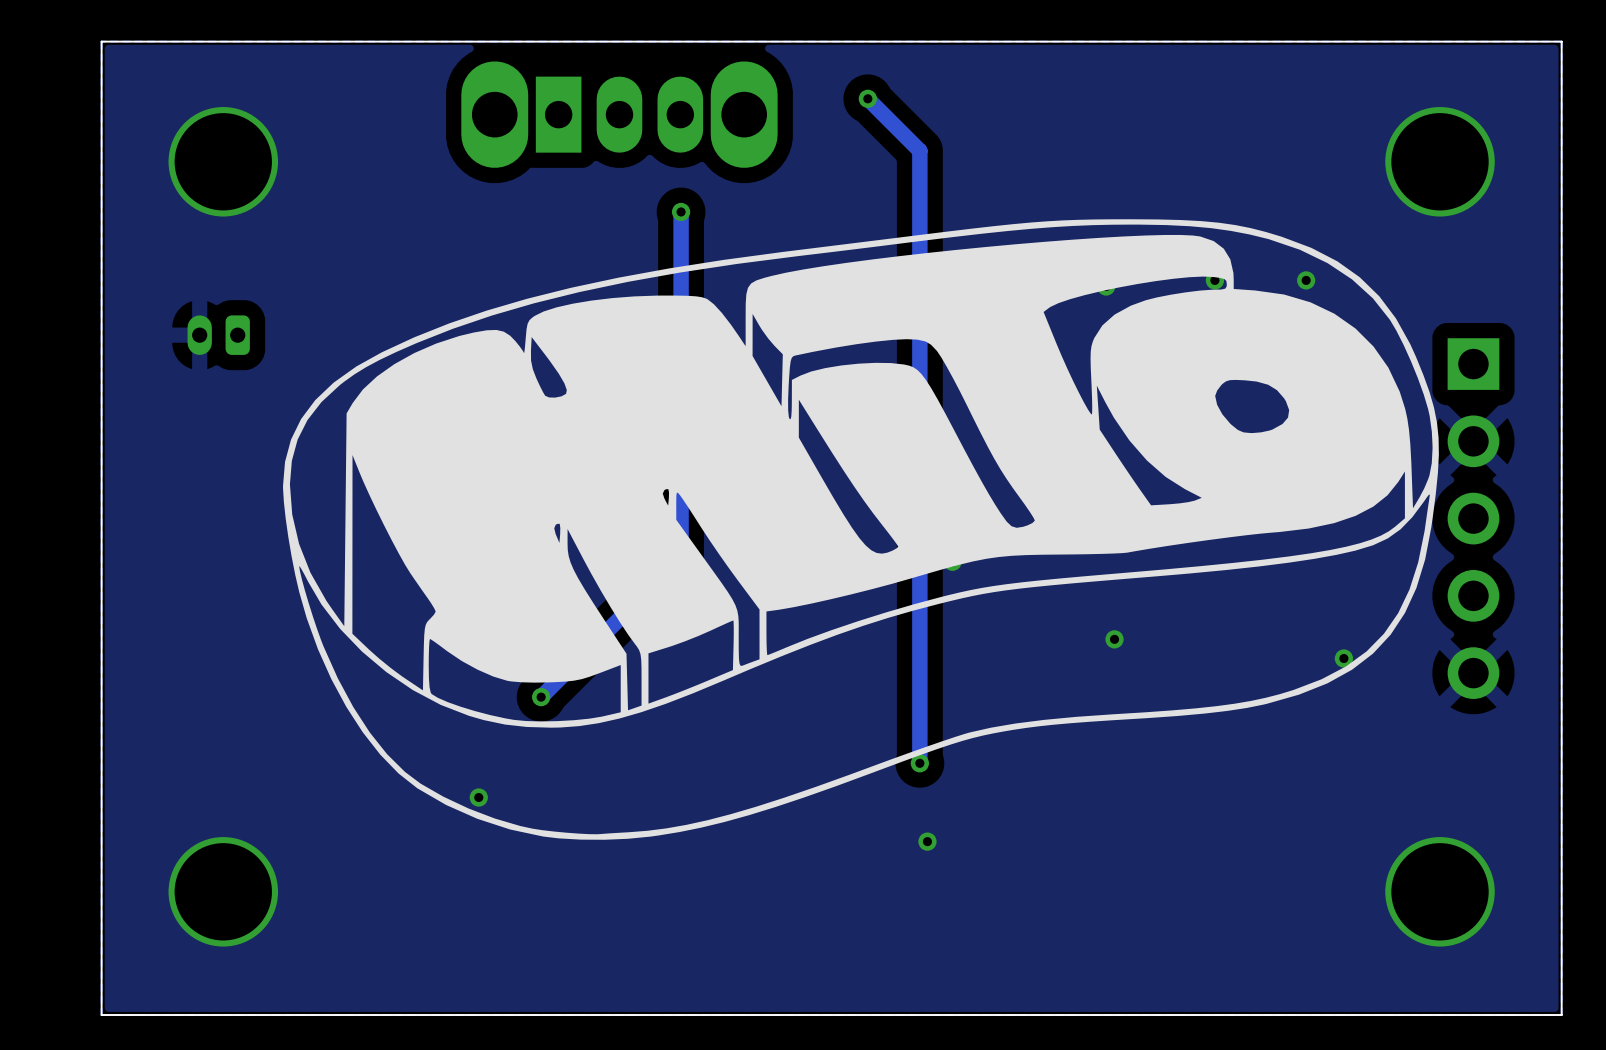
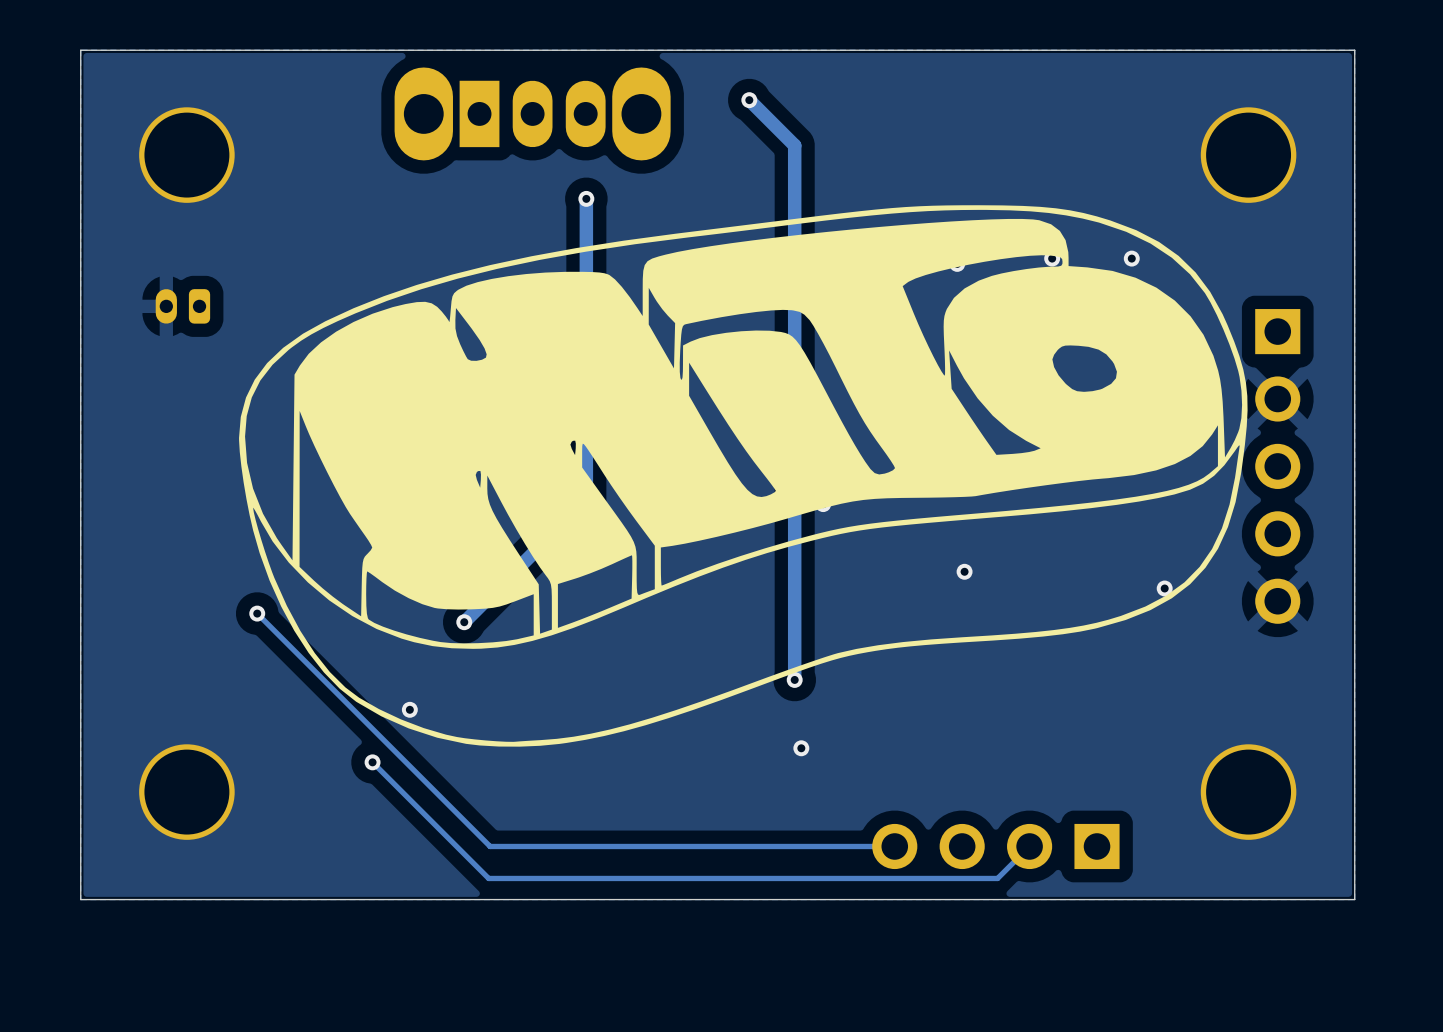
track: none -> (257, 613) (490, 846) (894, 846)
via: none -> (257, 613)
track: none -> (372, 762) (488, 878) (997, 878) (1029, 846)
via: none -> (372, 762)
part: none -> (995, 846)

